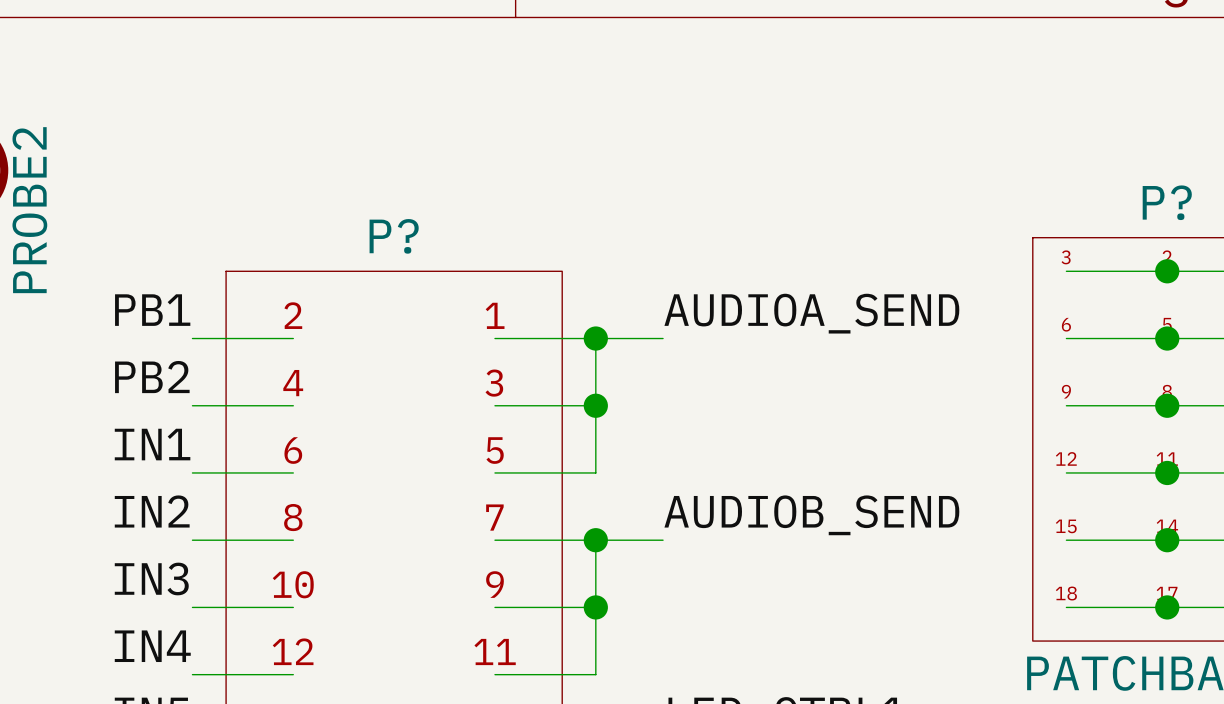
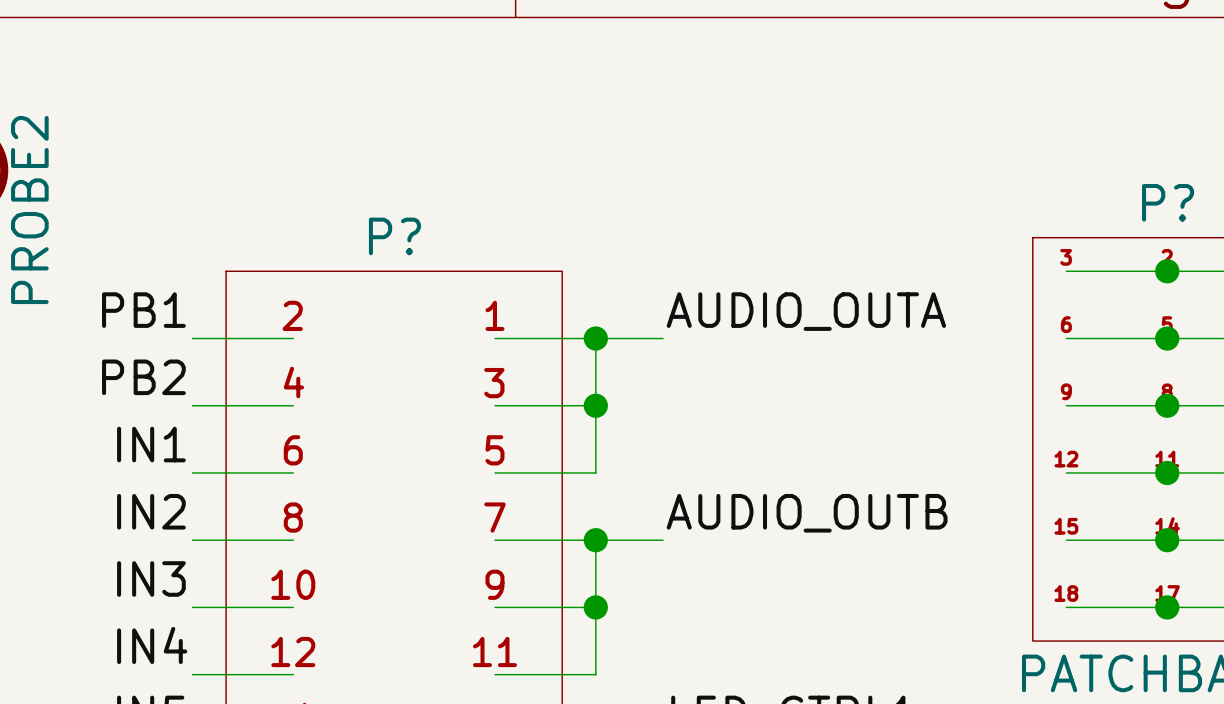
label: AUDIOA_SEND (811, 313) -> AUDIO_OUTA (806, 311)
label: AUDIOB_SEND (811, 515) -> AUDIO_OUTB (807, 513)

